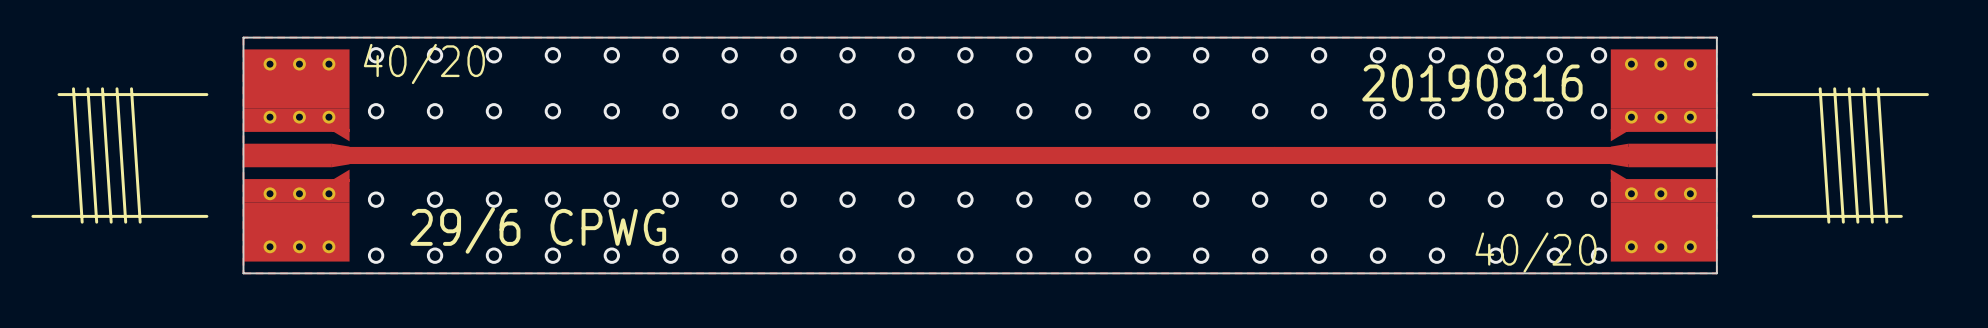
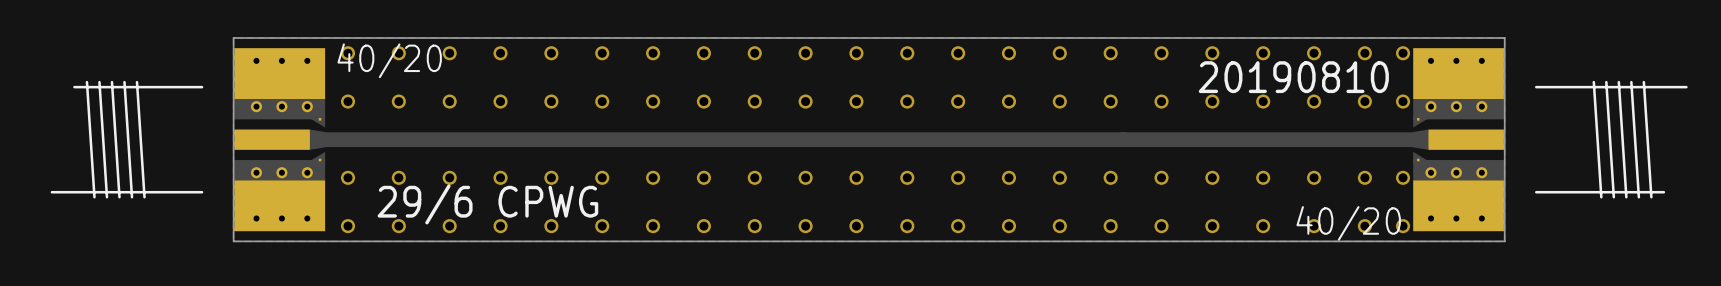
text: 20190816 (1472, 82) -> 20190810 (1293, 77)

